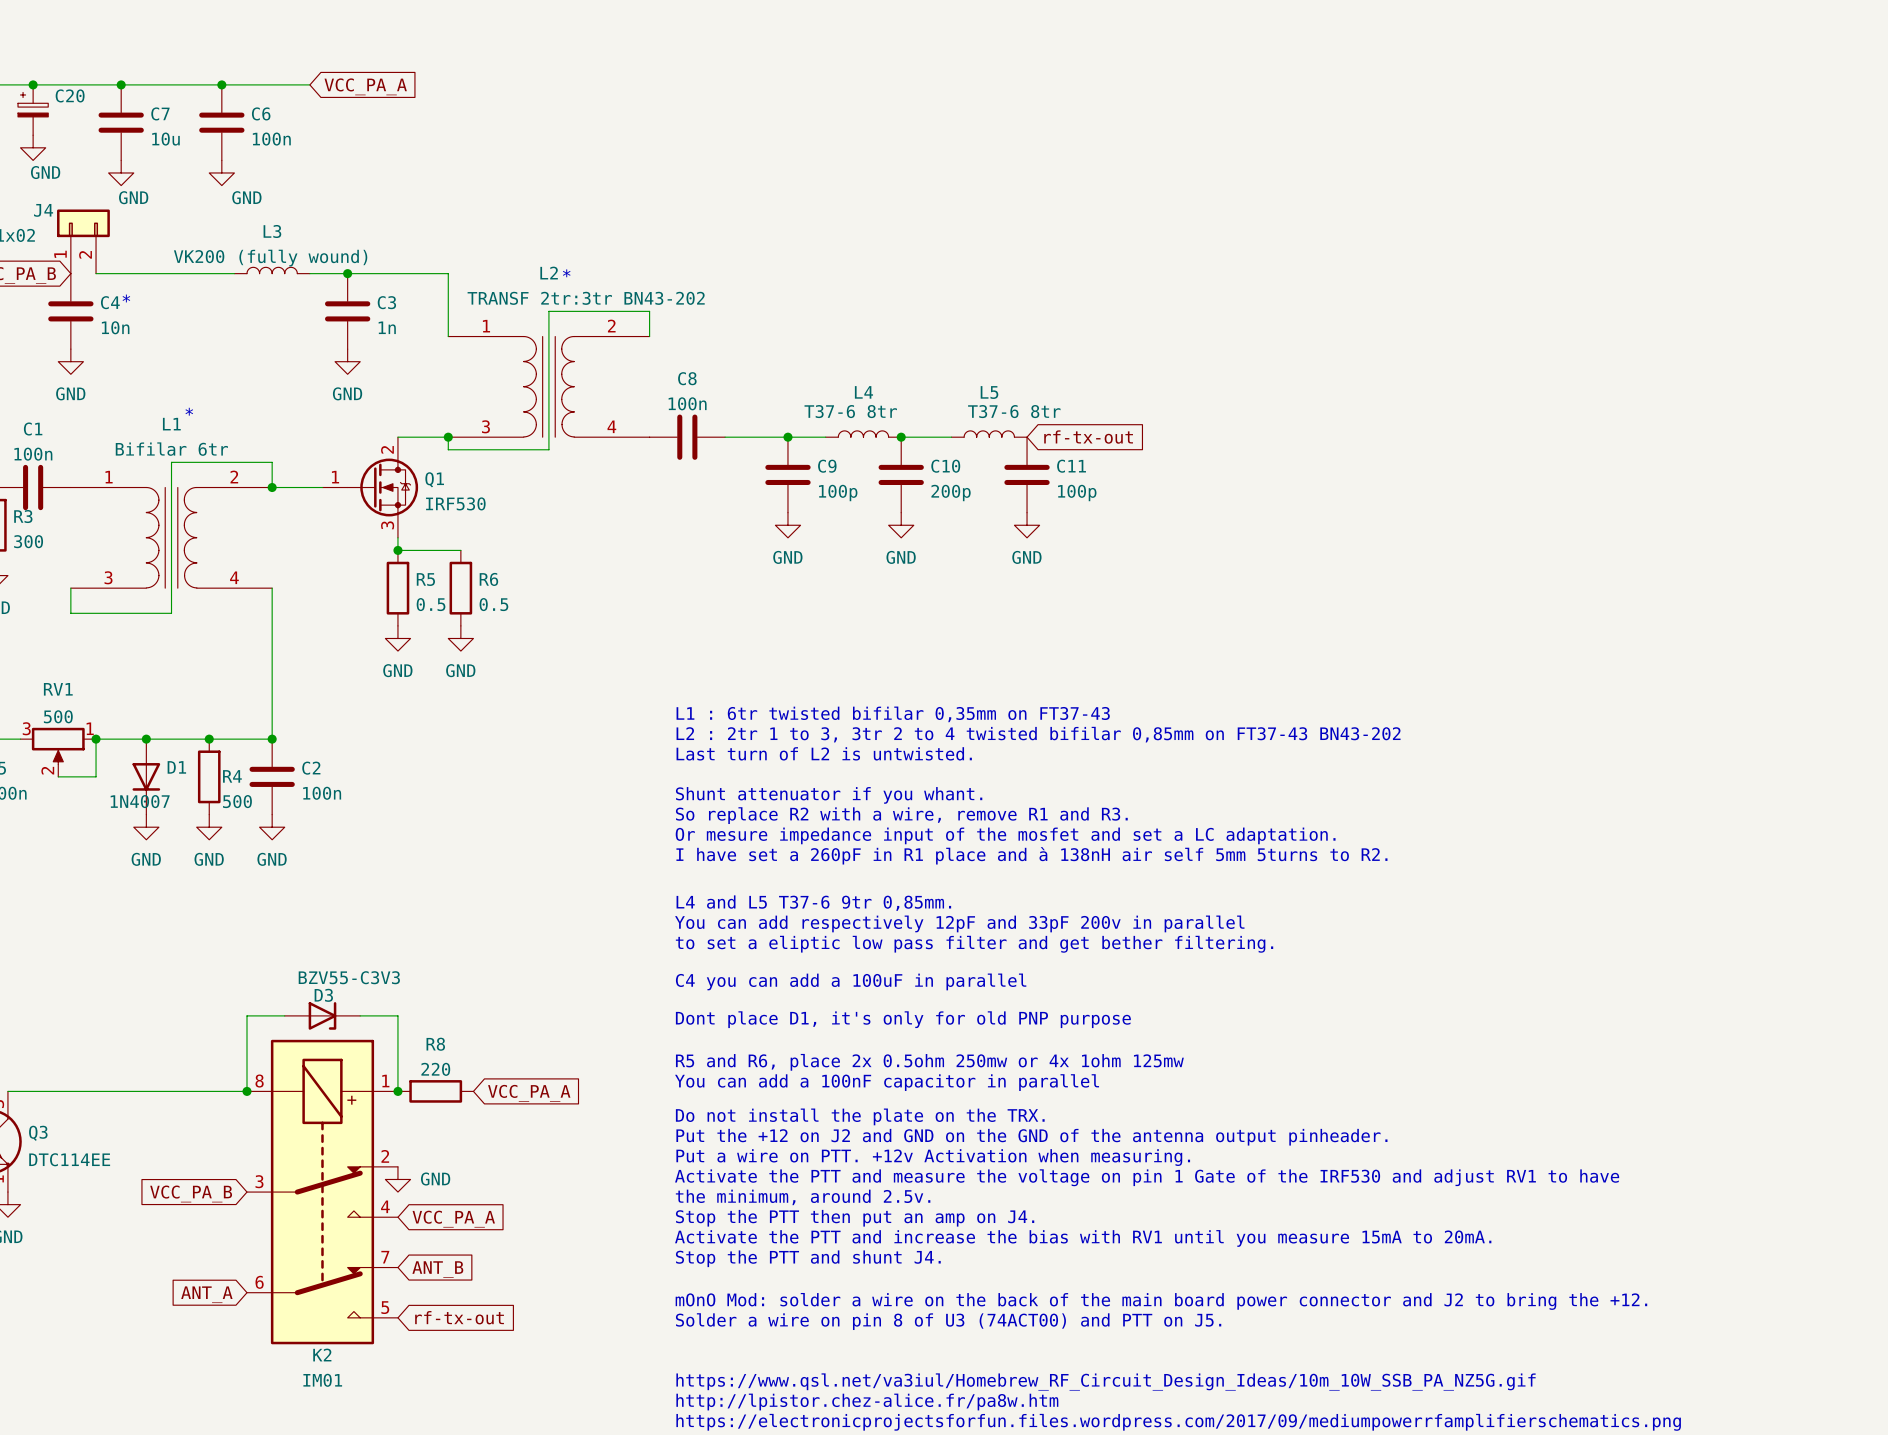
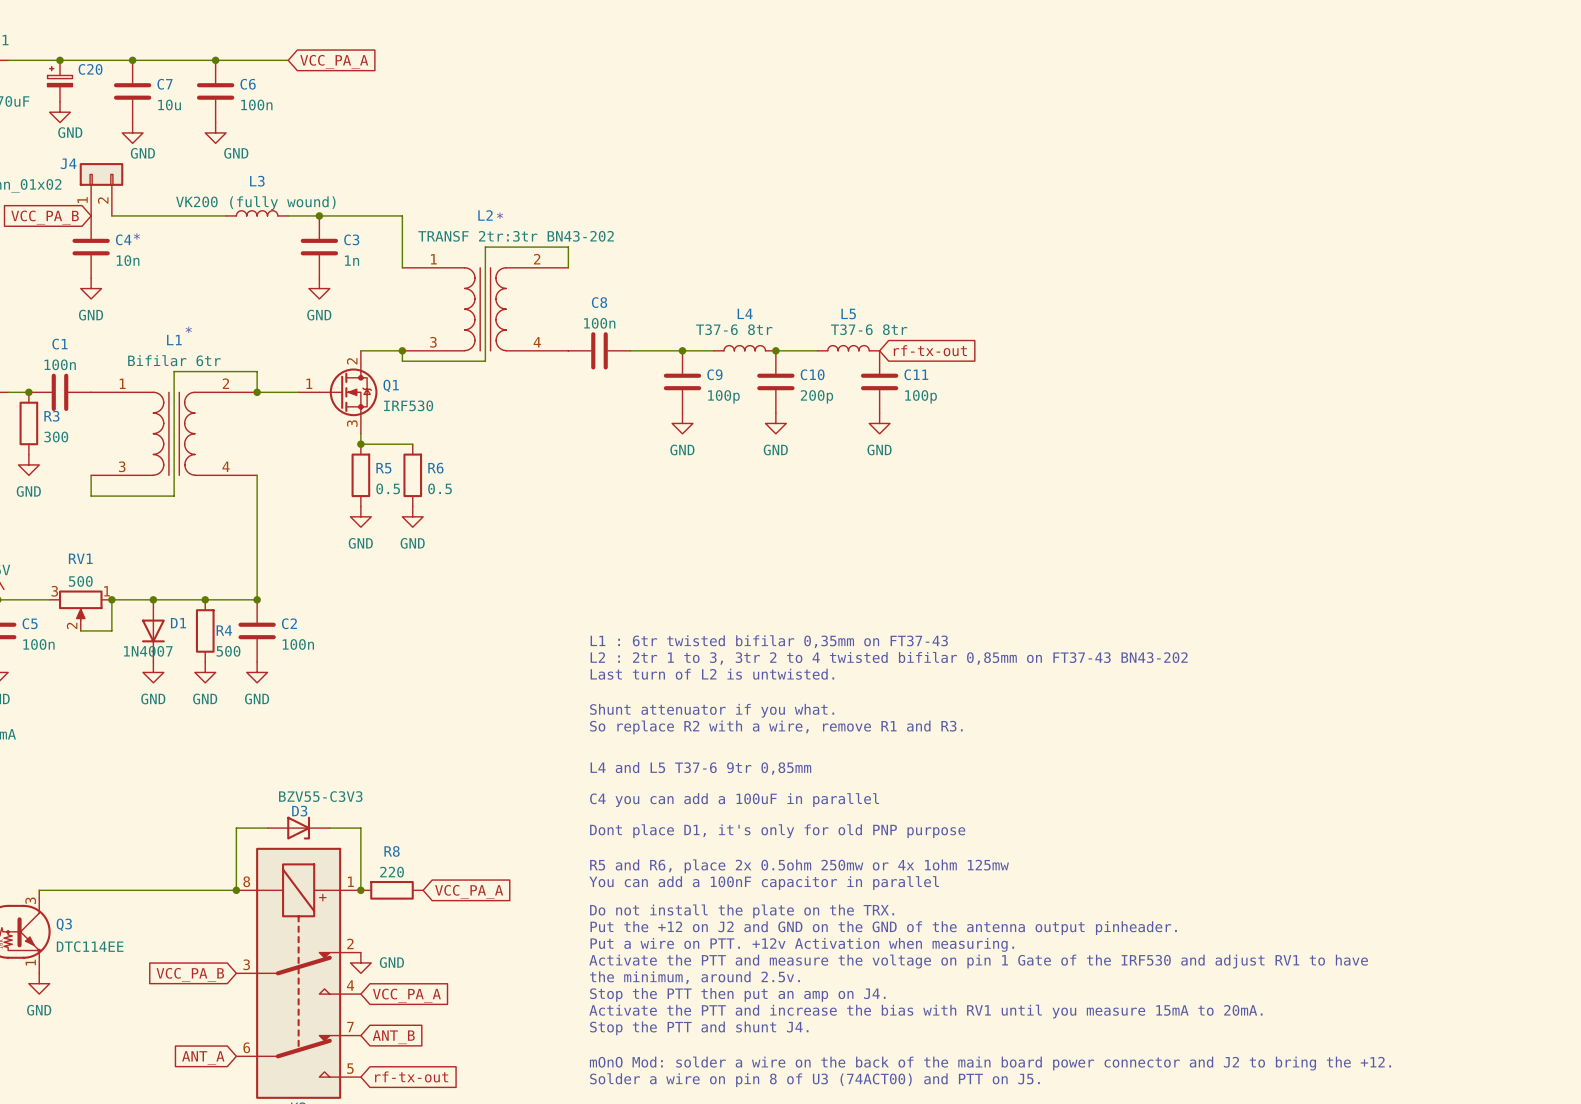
text position: L1 : 6tr twisted bifilar 0,35mm on FT37-43 (893, 714) -> L1 : 6tr twisted bifilar 0,35mm on FT37-43 (769, 641)
text position: L2 : 2tr 1 to 3, 3tr 2 to 4 twisted bifilar 0,85mm on FT37-43 BN43-202 (1038, 734) -> L2 : 2tr 1 to 3, 3tr 2 to 4 twisted bifilar 0,85mm on FT37-43 BN43-202 (889, 658)
text position: Last turn of L2 is untwisted. (824, 753) -> Last turn of L2 is untwisted. (712, 674)
text: Shunt attenuator if you whant. (829, 795) -> none
text position: So replace R2 with a wire, remove R1 and R3. (901, 815) -> So replace R2 with a wire, remove R1 and R3. (776, 727)
text: Or mesure impedance input of the mosfet and set a LC adaptation. (1005, 835) -> none
text: I have set a 260pF in R1 place and à 138nH air self 5mm 5turns to R2. (1031, 855) -> none
text: none -> Shunt attenuator if you what. (712, 710)
text: L4 and L5 T37-6 9tr 0,85mm. (813, 903) -> none
text: You can add respectively 12pF and 33pF 200v in parallel (959, 923) -> none
text: to set a eliptic low pass filter and get bether filtering. (974, 944) -> L4 and L5 T37-6 9tr 0,85mm (700, 768)

